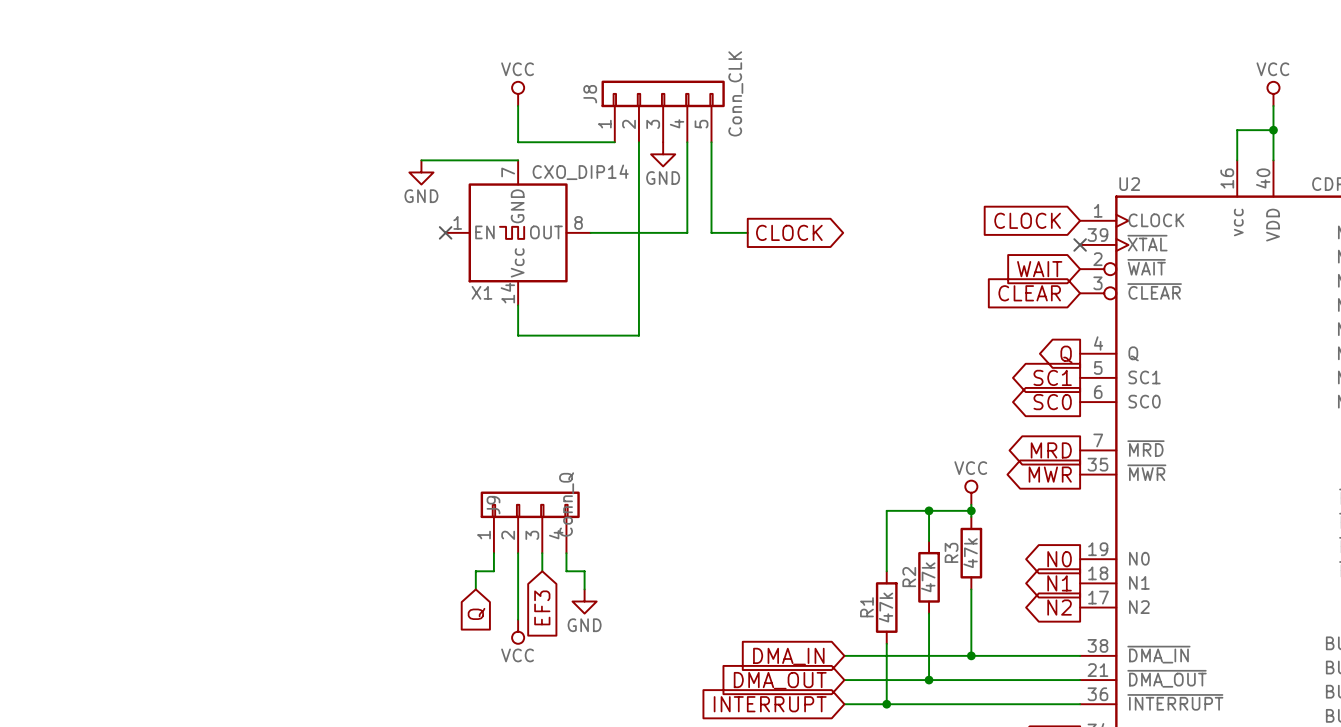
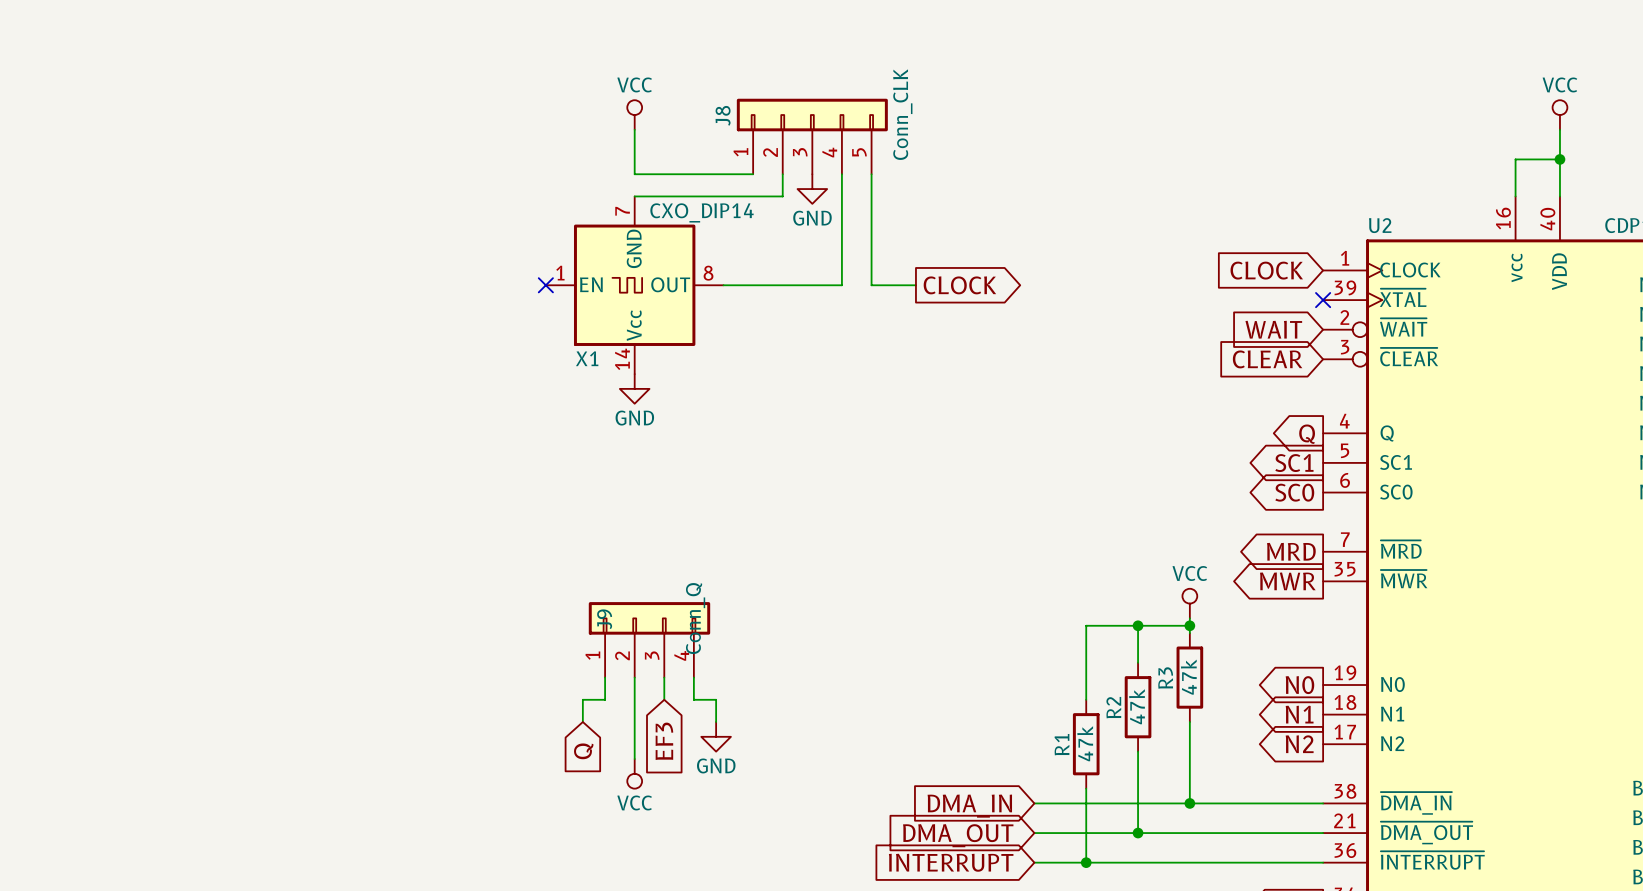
wire: (421, 160) (518, 160) -> none
wire: (638, 160) (638, 335) (518, 335) (518, 305) -> (782, 196) (634, 196)
power symbol position: GND (421, 172) -> GND (634, 388)

